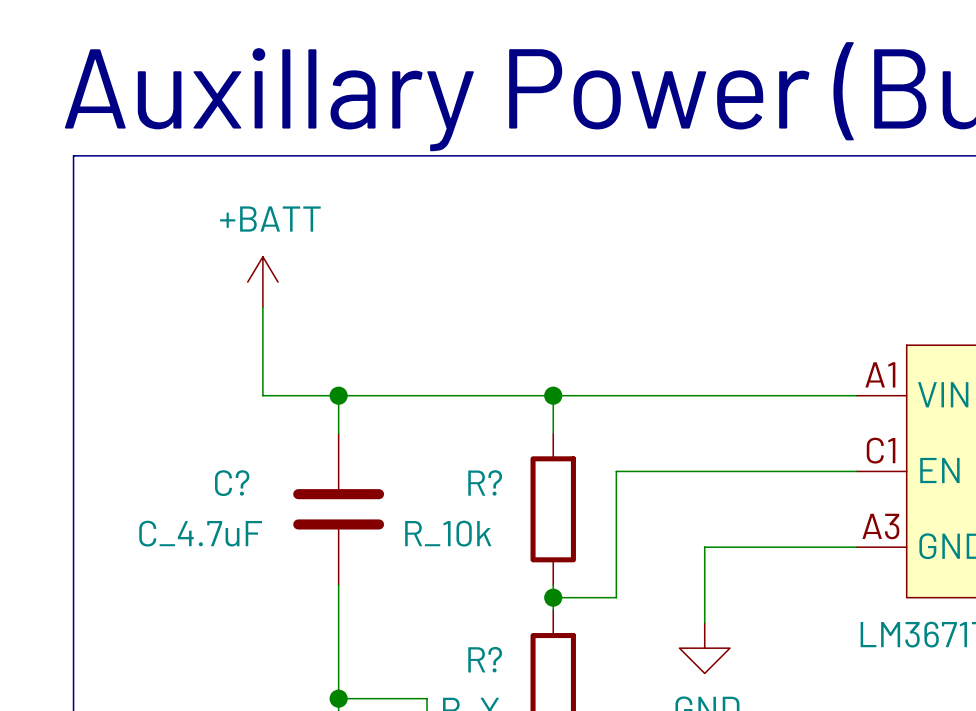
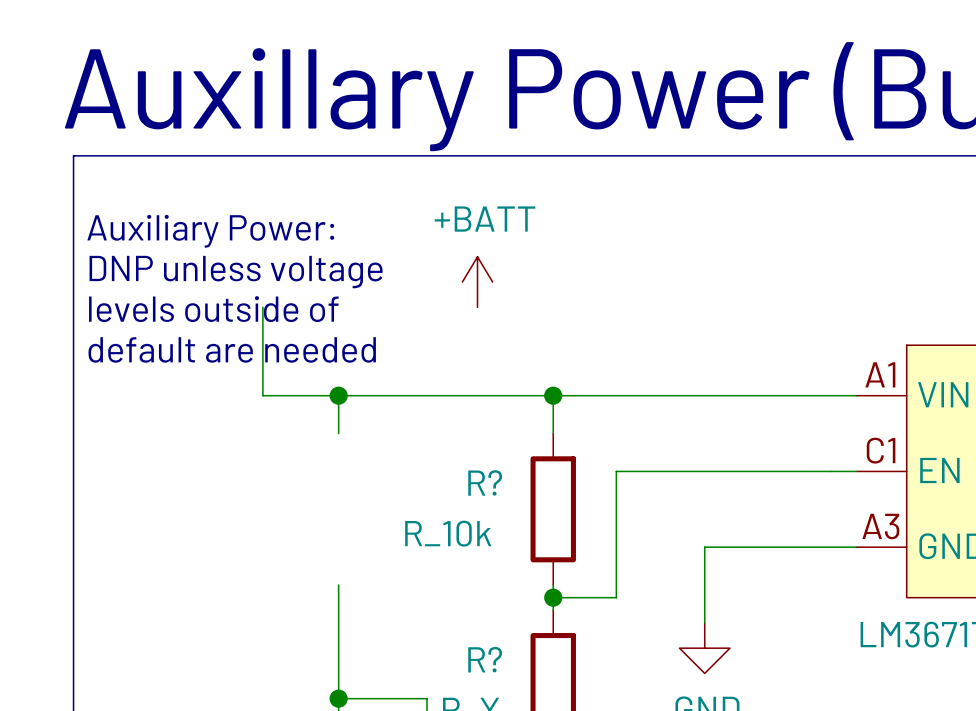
text: none -> Auxiliary Power: (210, 231)
text: none -> DNP unless voltage (236, 272)
power symbol position: +BATT (262, 282) -> +BATT (477, 282)
text: none -> levels outside of (213, 309)
text: none -> default are needed (232, 349)
C?: C_4.7uF (338, 509) -> none

